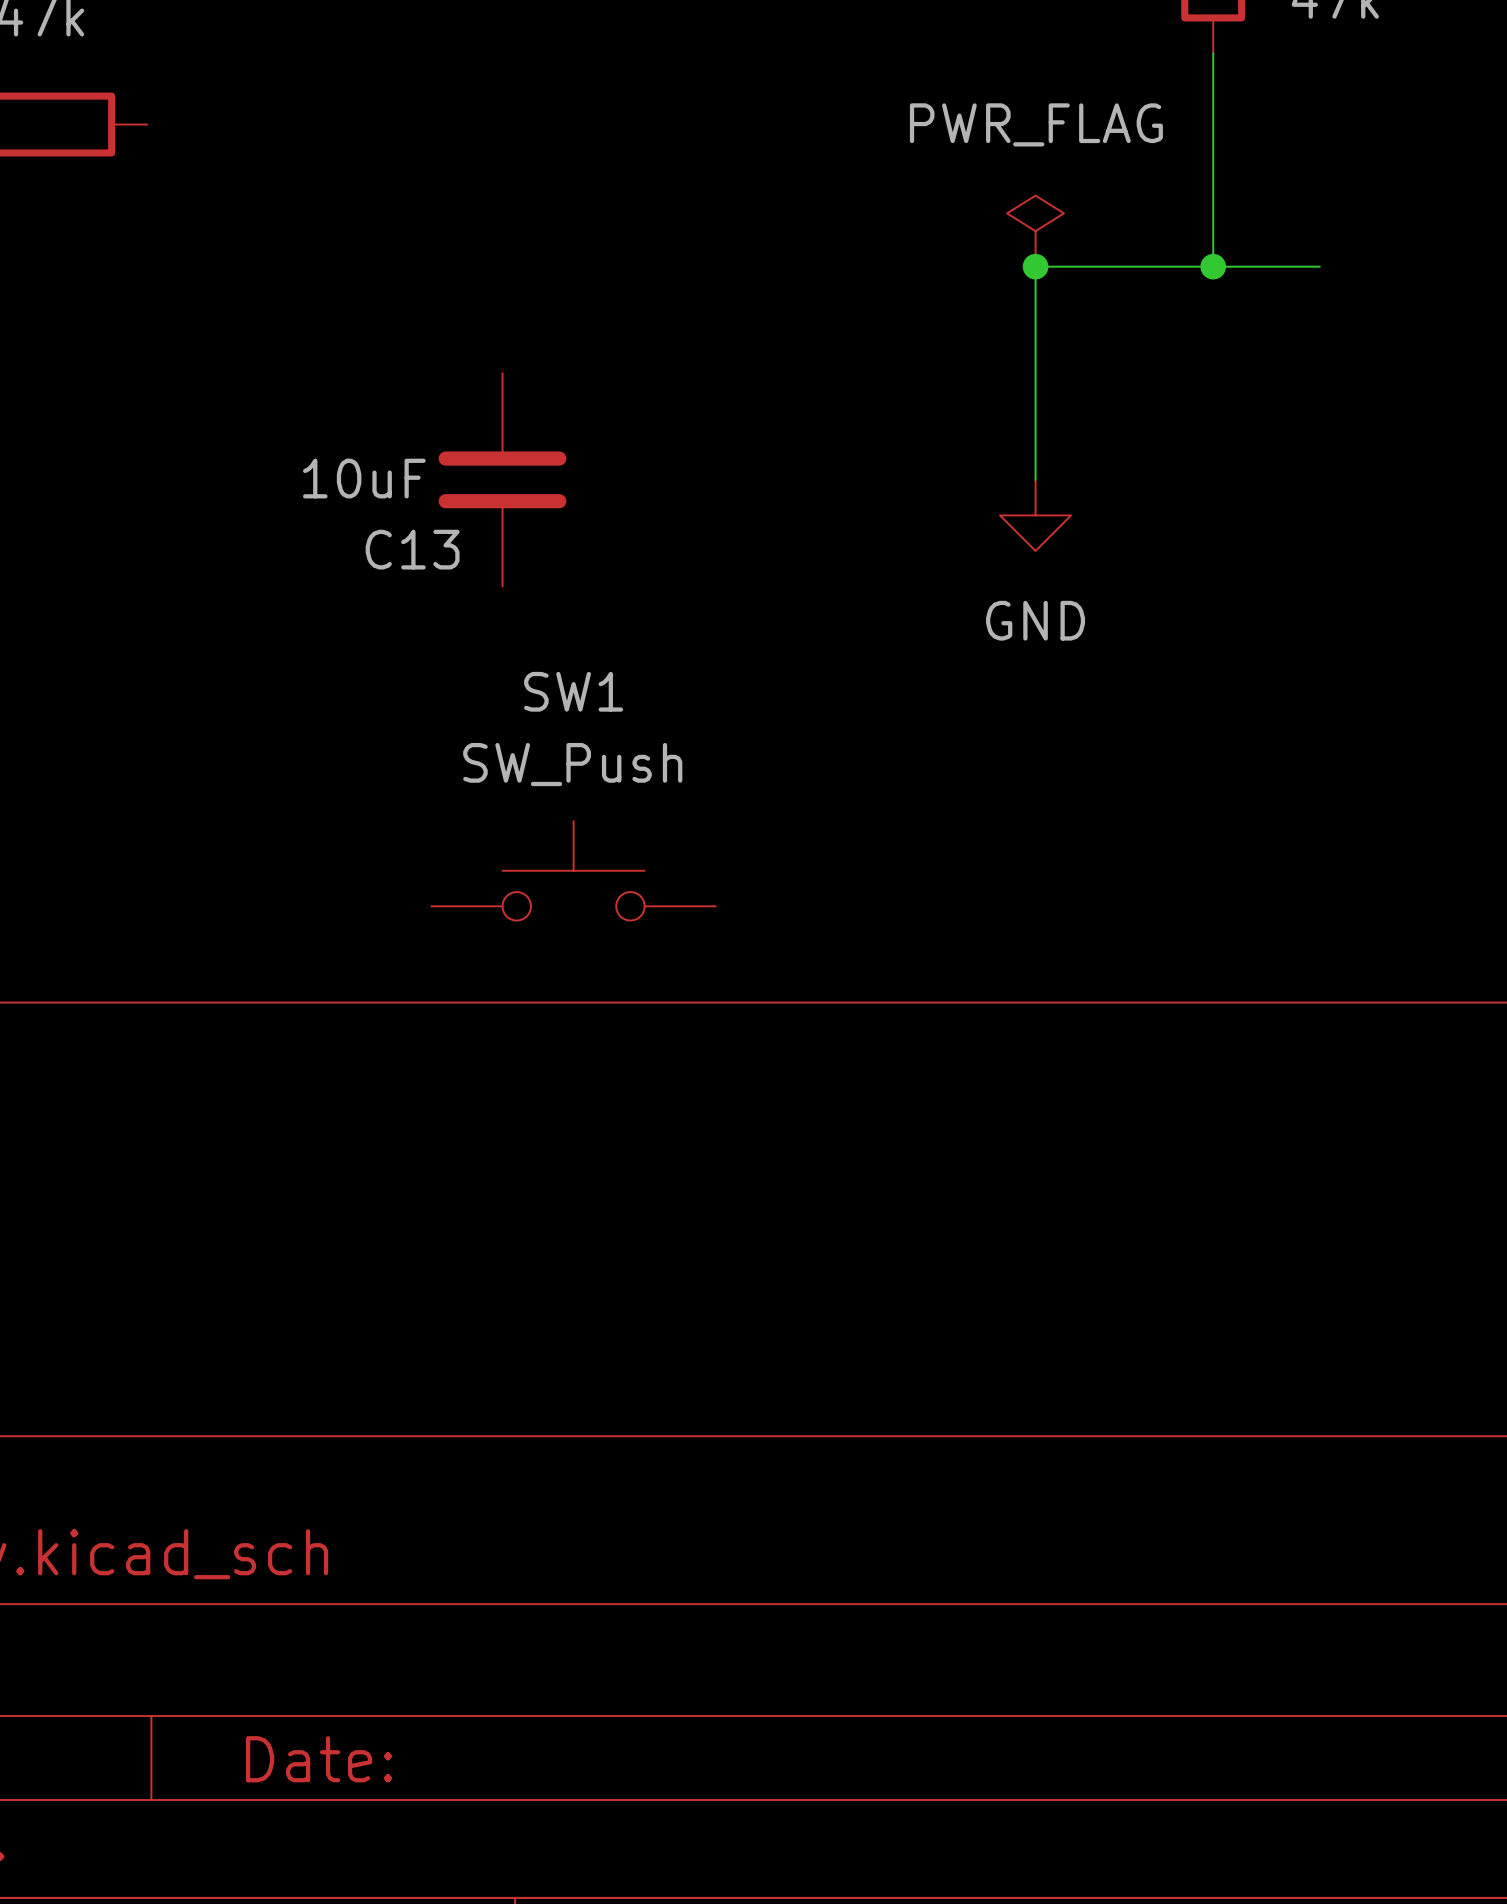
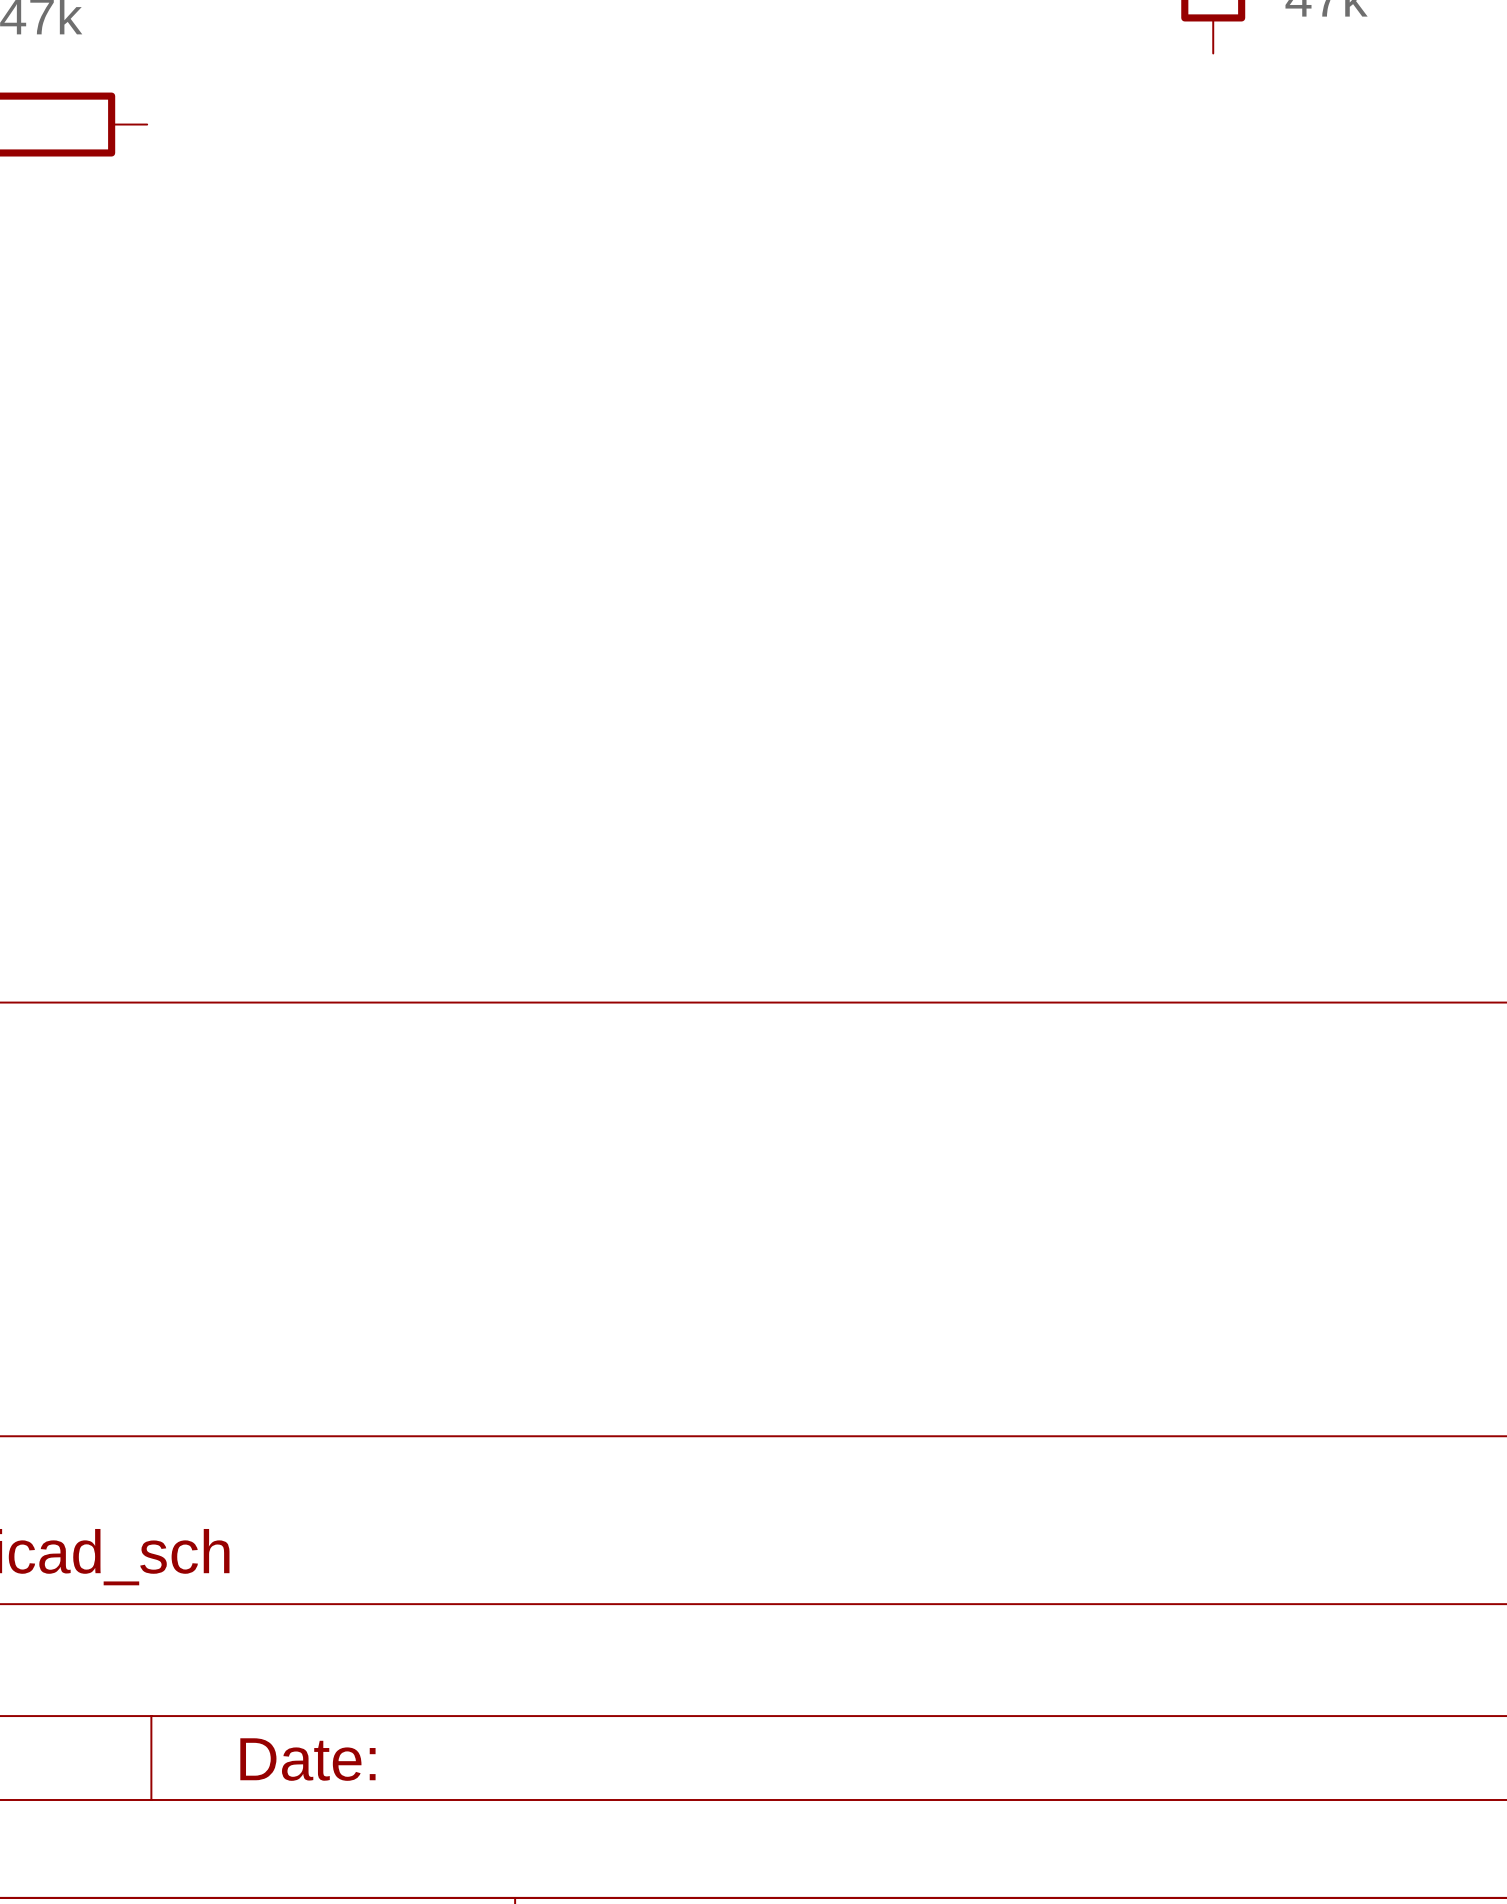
wire: (1213, 53) (1213, 266) -> none
power symbol: PWR_FLAG (1035, 231) -> none
junction: (1035, 266) -> none
junction: (1213, 266) -> none
wire: (1319, 266) (1035, 266) (1035, 479) -> none
C13: 10uF (502, 479) -> none
power symbol: GND (1035, 515) -> none
SW1: SW_Push (573, 870) -> none

